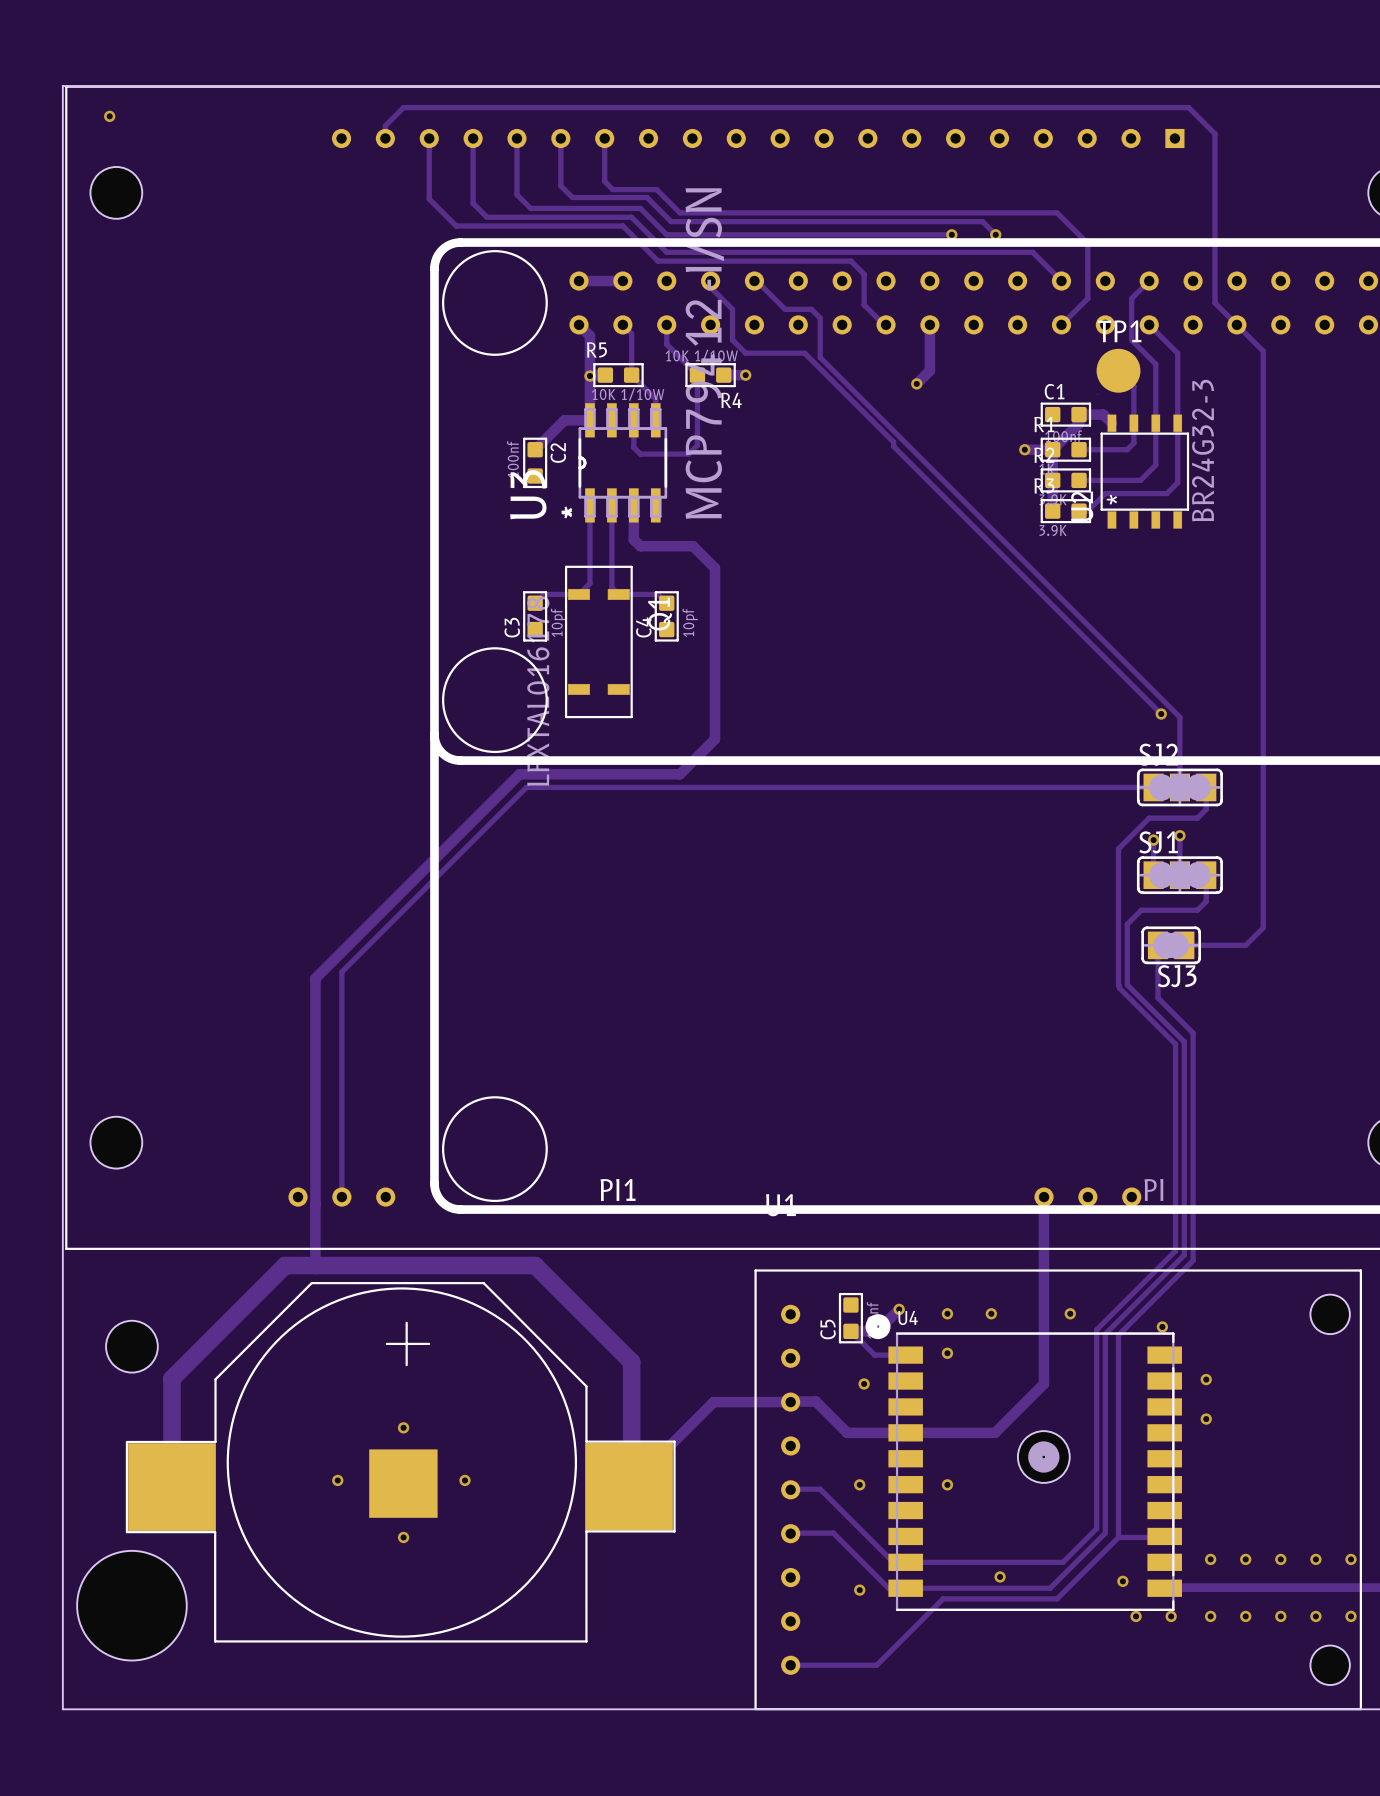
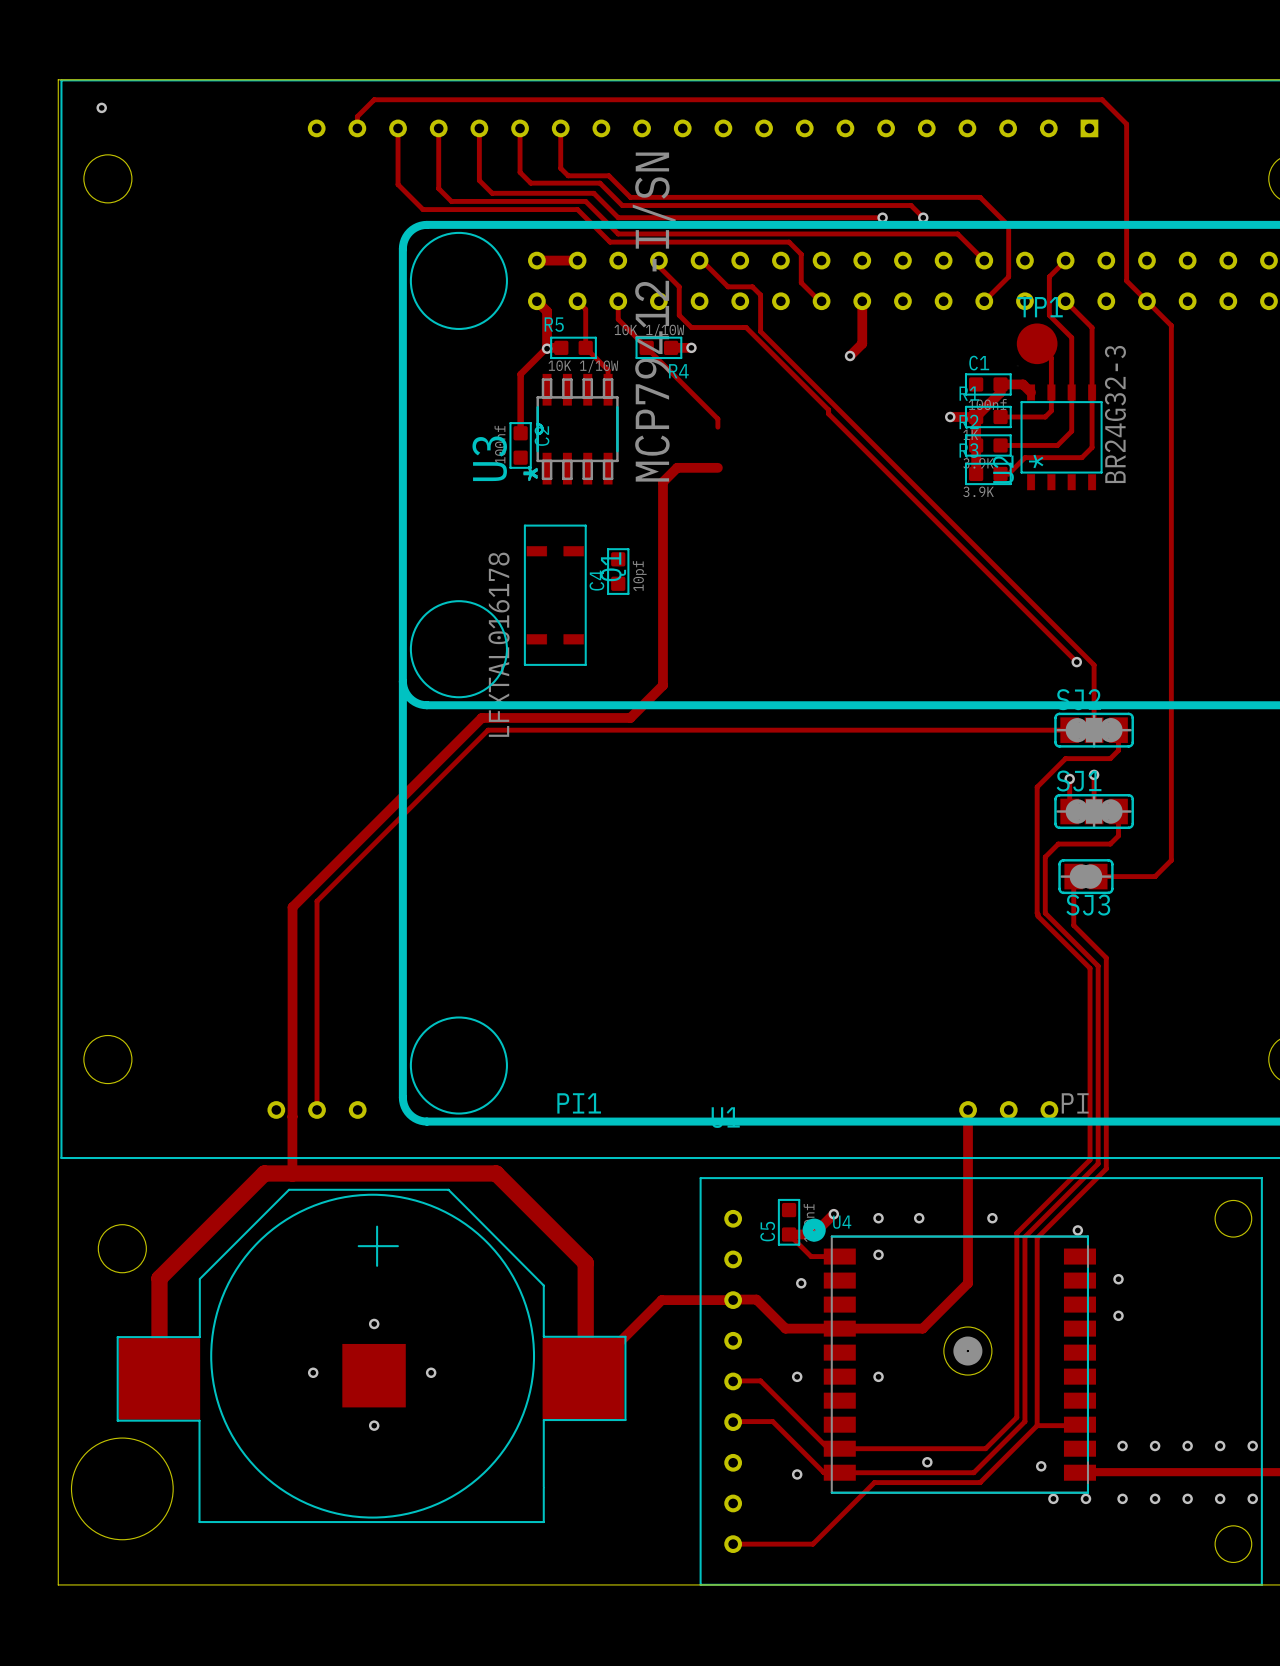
track: none -> (547, 347) (520, 374) (520, 433)
track: (697, 375) (697, 445) (688, 454) (640, 454) (633, 447) (633, 420) -> (646, 347) (717, 419) (717, 427)
track: (589, 376) (589, 420) (564, 420) (535, 449) -> none
C2 position: (535, 462) -> (520, 445)
track: (589, 505) (589, 583) (579, 594) (543, 594) (535, 603) -> none
track: (611, 505) (611, 587) (618, 594) (657, 594) (666, 603) -> none
track: (633, 505) (633, 539) (640, 546) (693, 546) (714, 568) -> (717, 467) (677, 467) (662, 482) (662, 526)
C3: 10pf (535, 616) -> none

